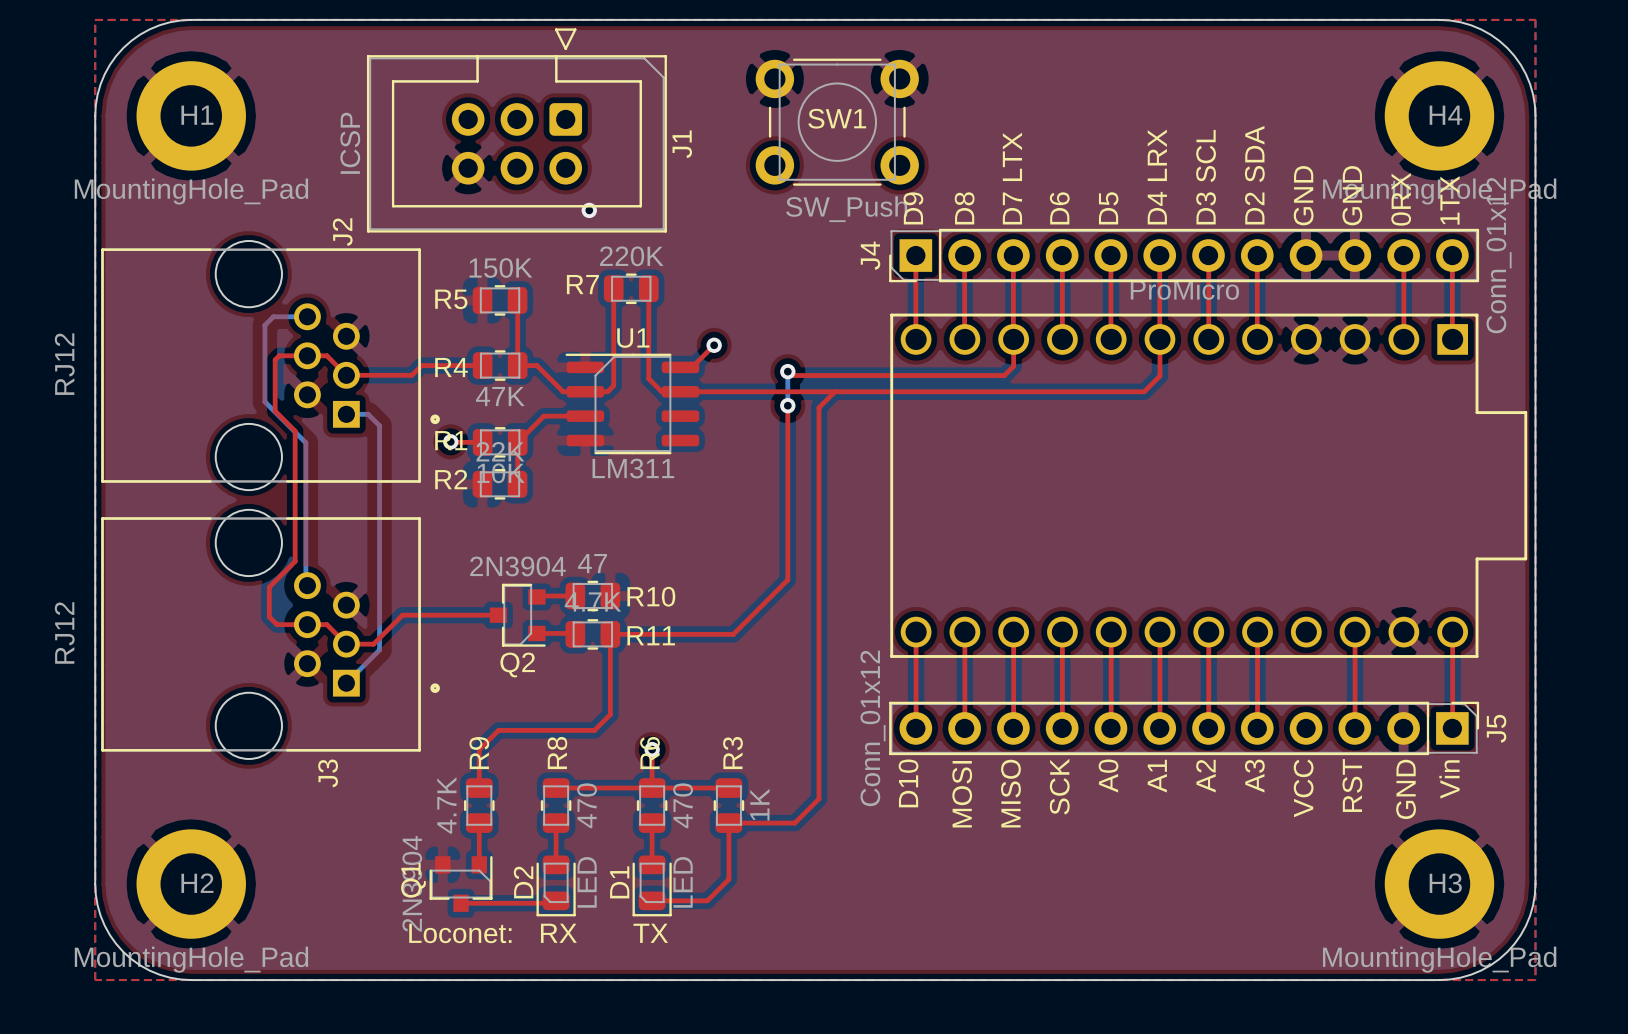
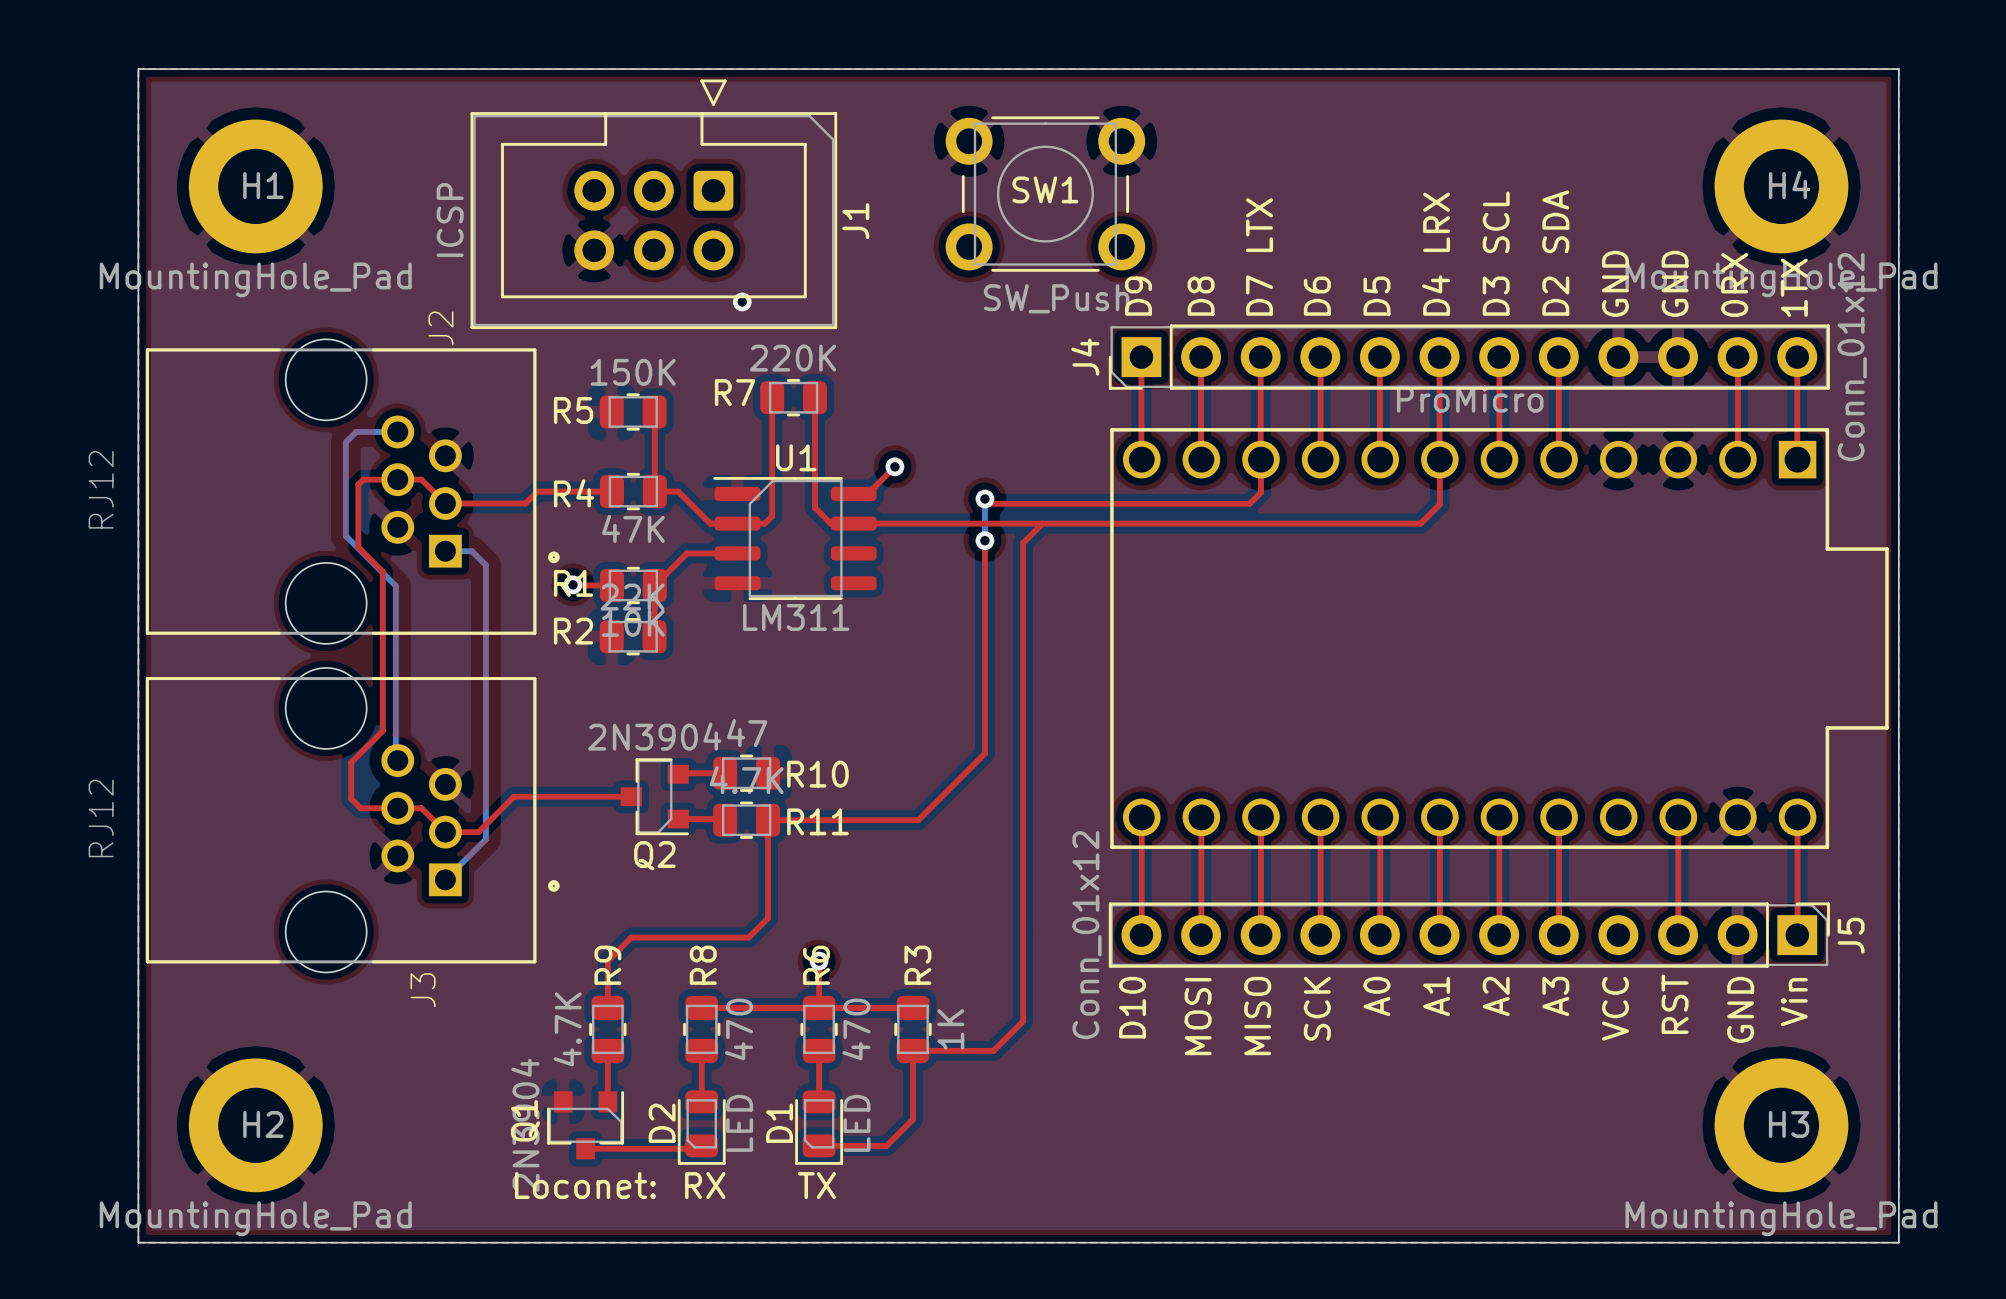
board edge: (191, 19) (159, 25) (140, 34) (123, 48) (104, 74) (97, 94) (95, 115) -> (255, 69) (138, 69) (138, 186)
board edge: (1439, 19) (1471, 25) (1490, 34) (1507, 48) (1520, 64) (1530, 84) (1535, 115) -> (1781, 69) (1898, 69) (1898, 186)
board edge: (95, 884) (97, 905) (104, 925) (123, 951) (140, 965) (159, 974) (191, 980) -> (138, 1125) (138, 1242) (255, 1242)
board edge: (1535, 884) (1530, 915) (1520, 935) (1507, 951) (1490, 965) (1471, 974) (1439, 980) -> (1898, 1125) (1898, 1242) (1781, 1242)

